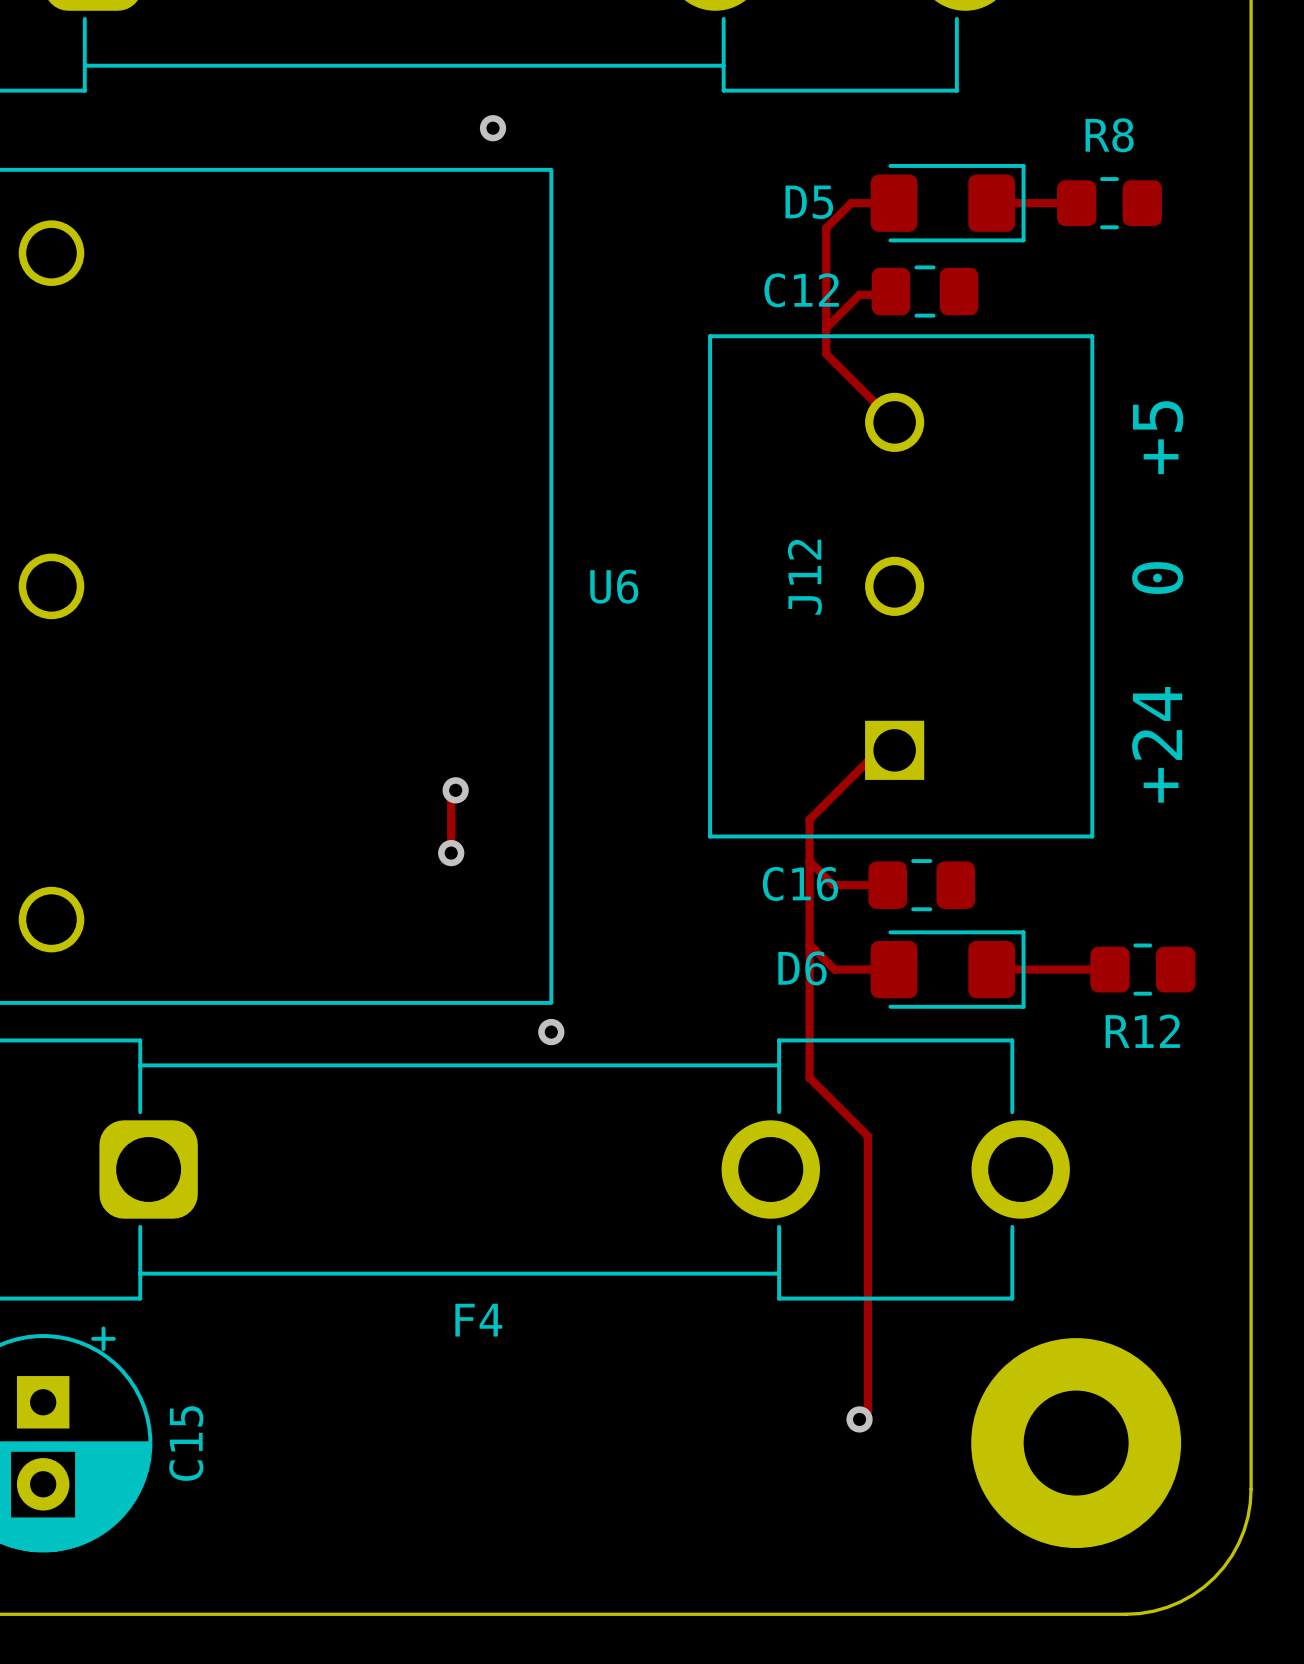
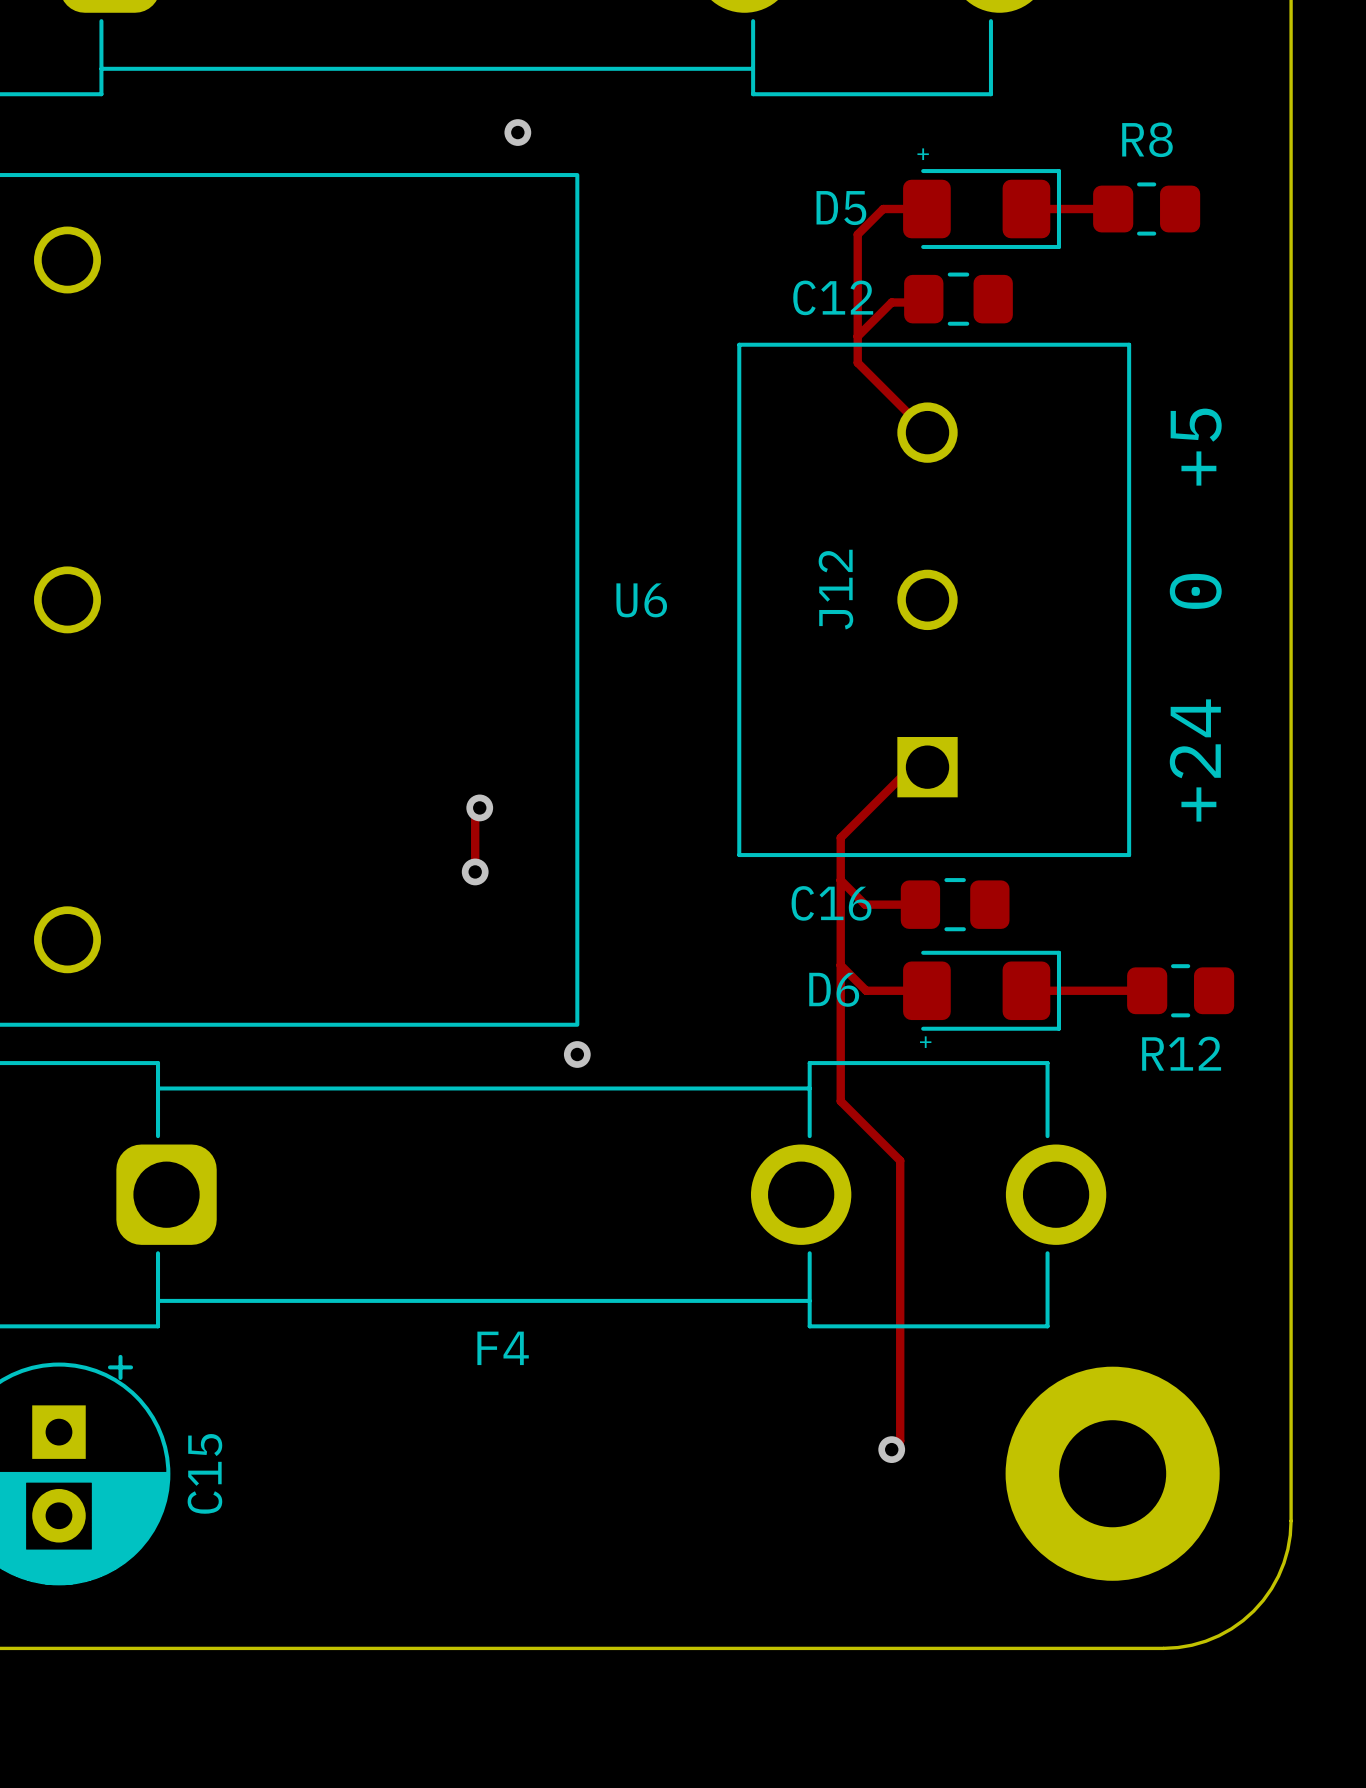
text: none -> + (923, 154)
text: none -> + (925, 1042)

